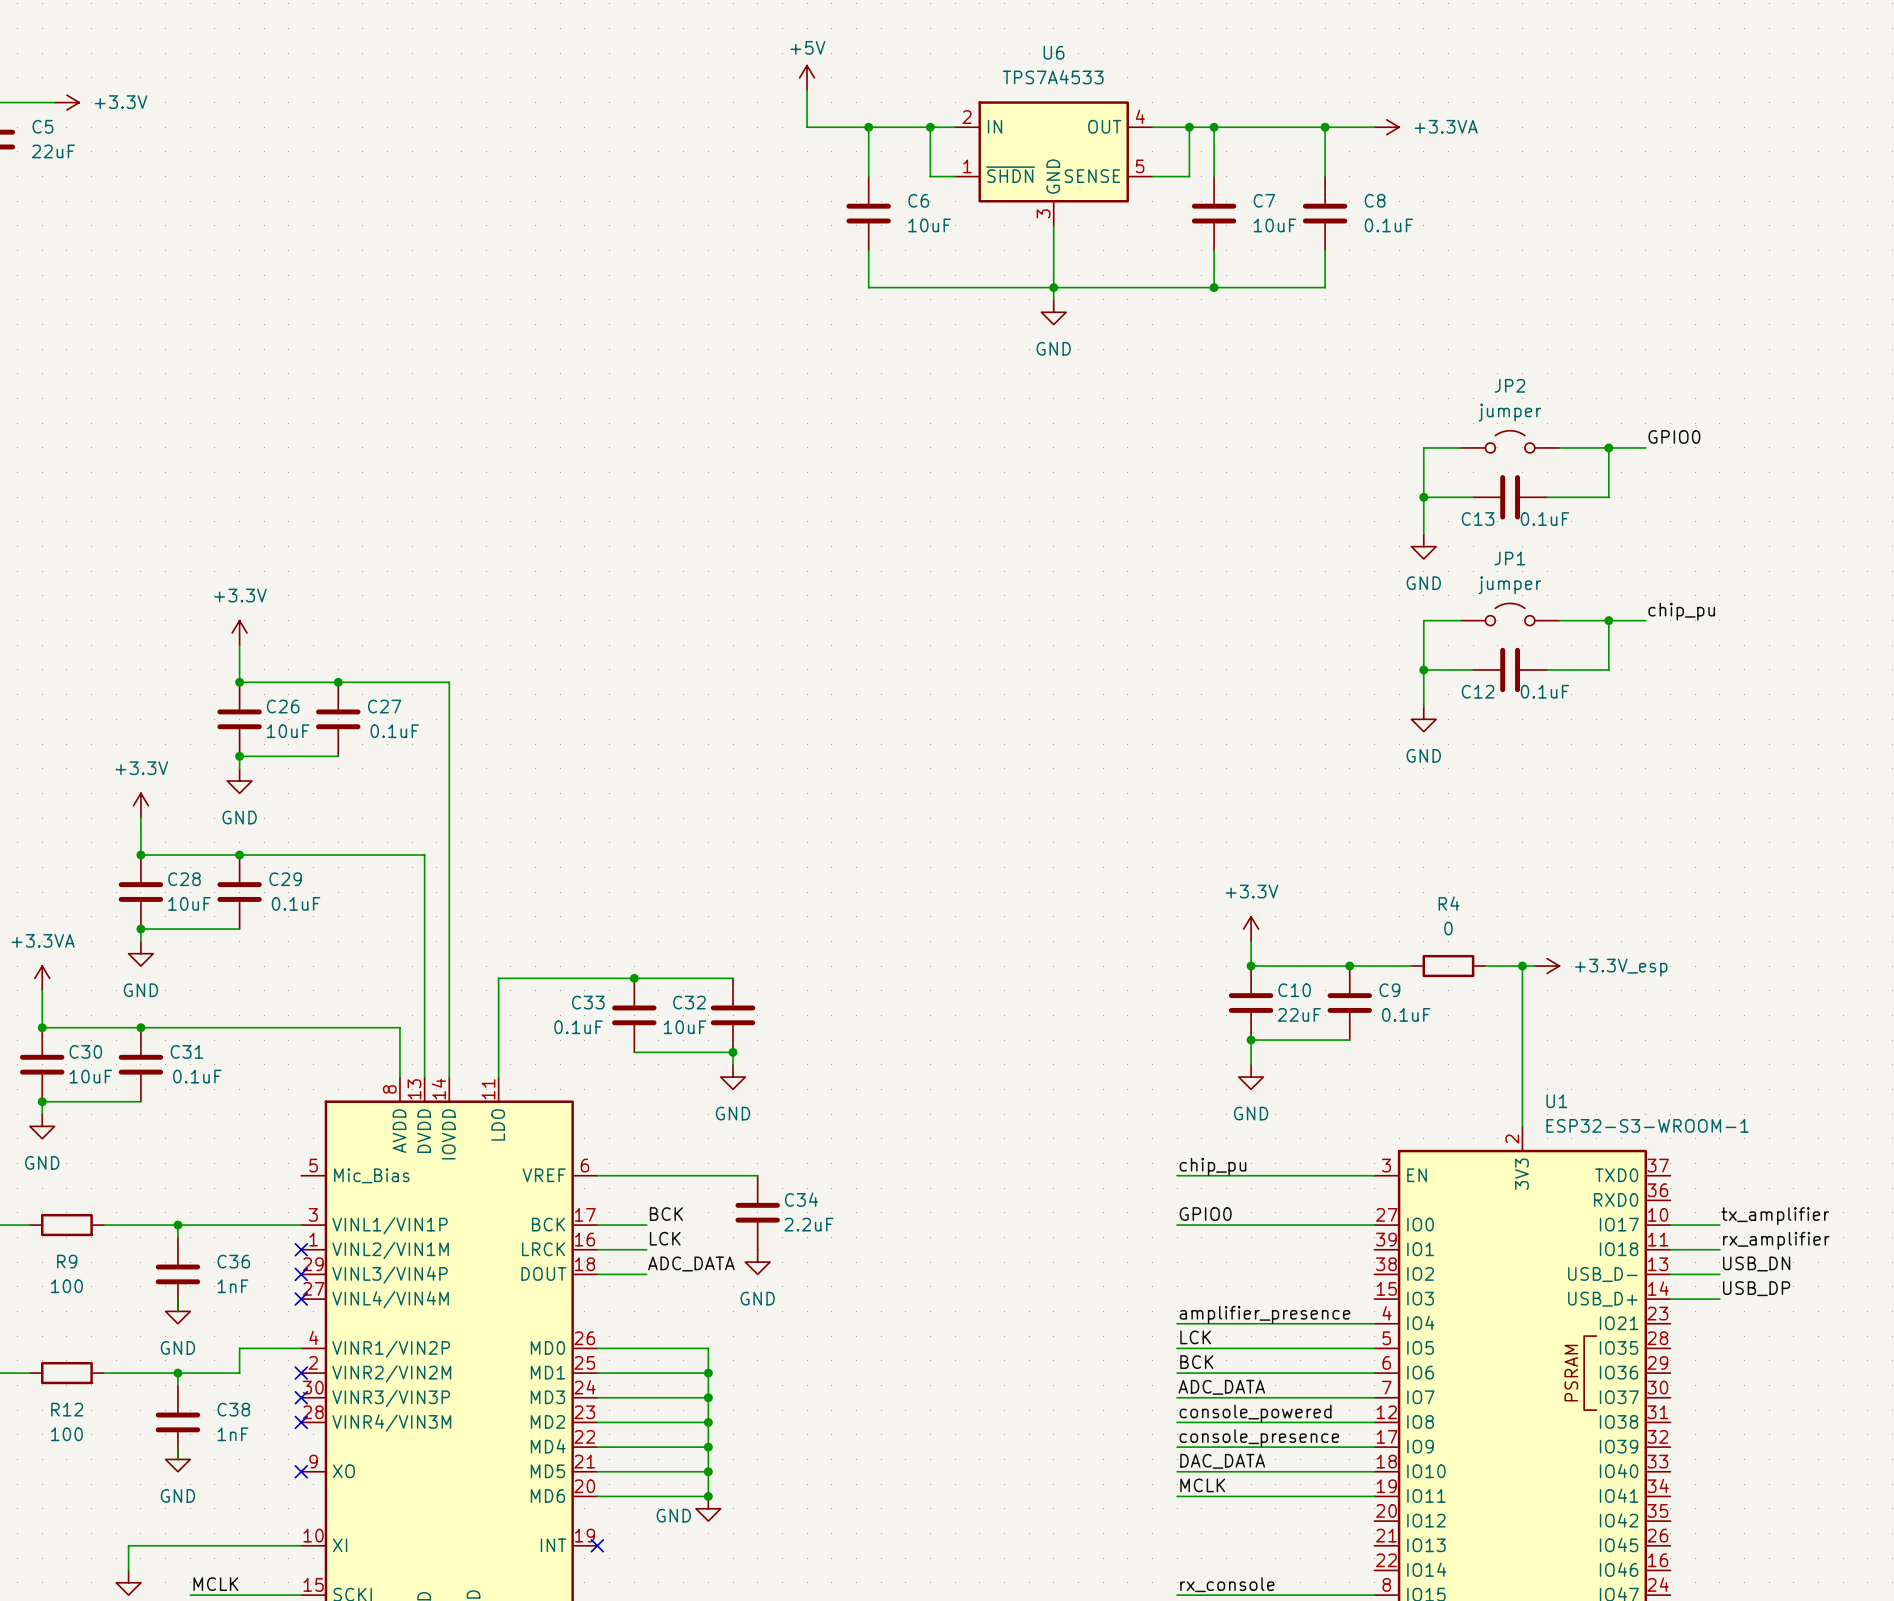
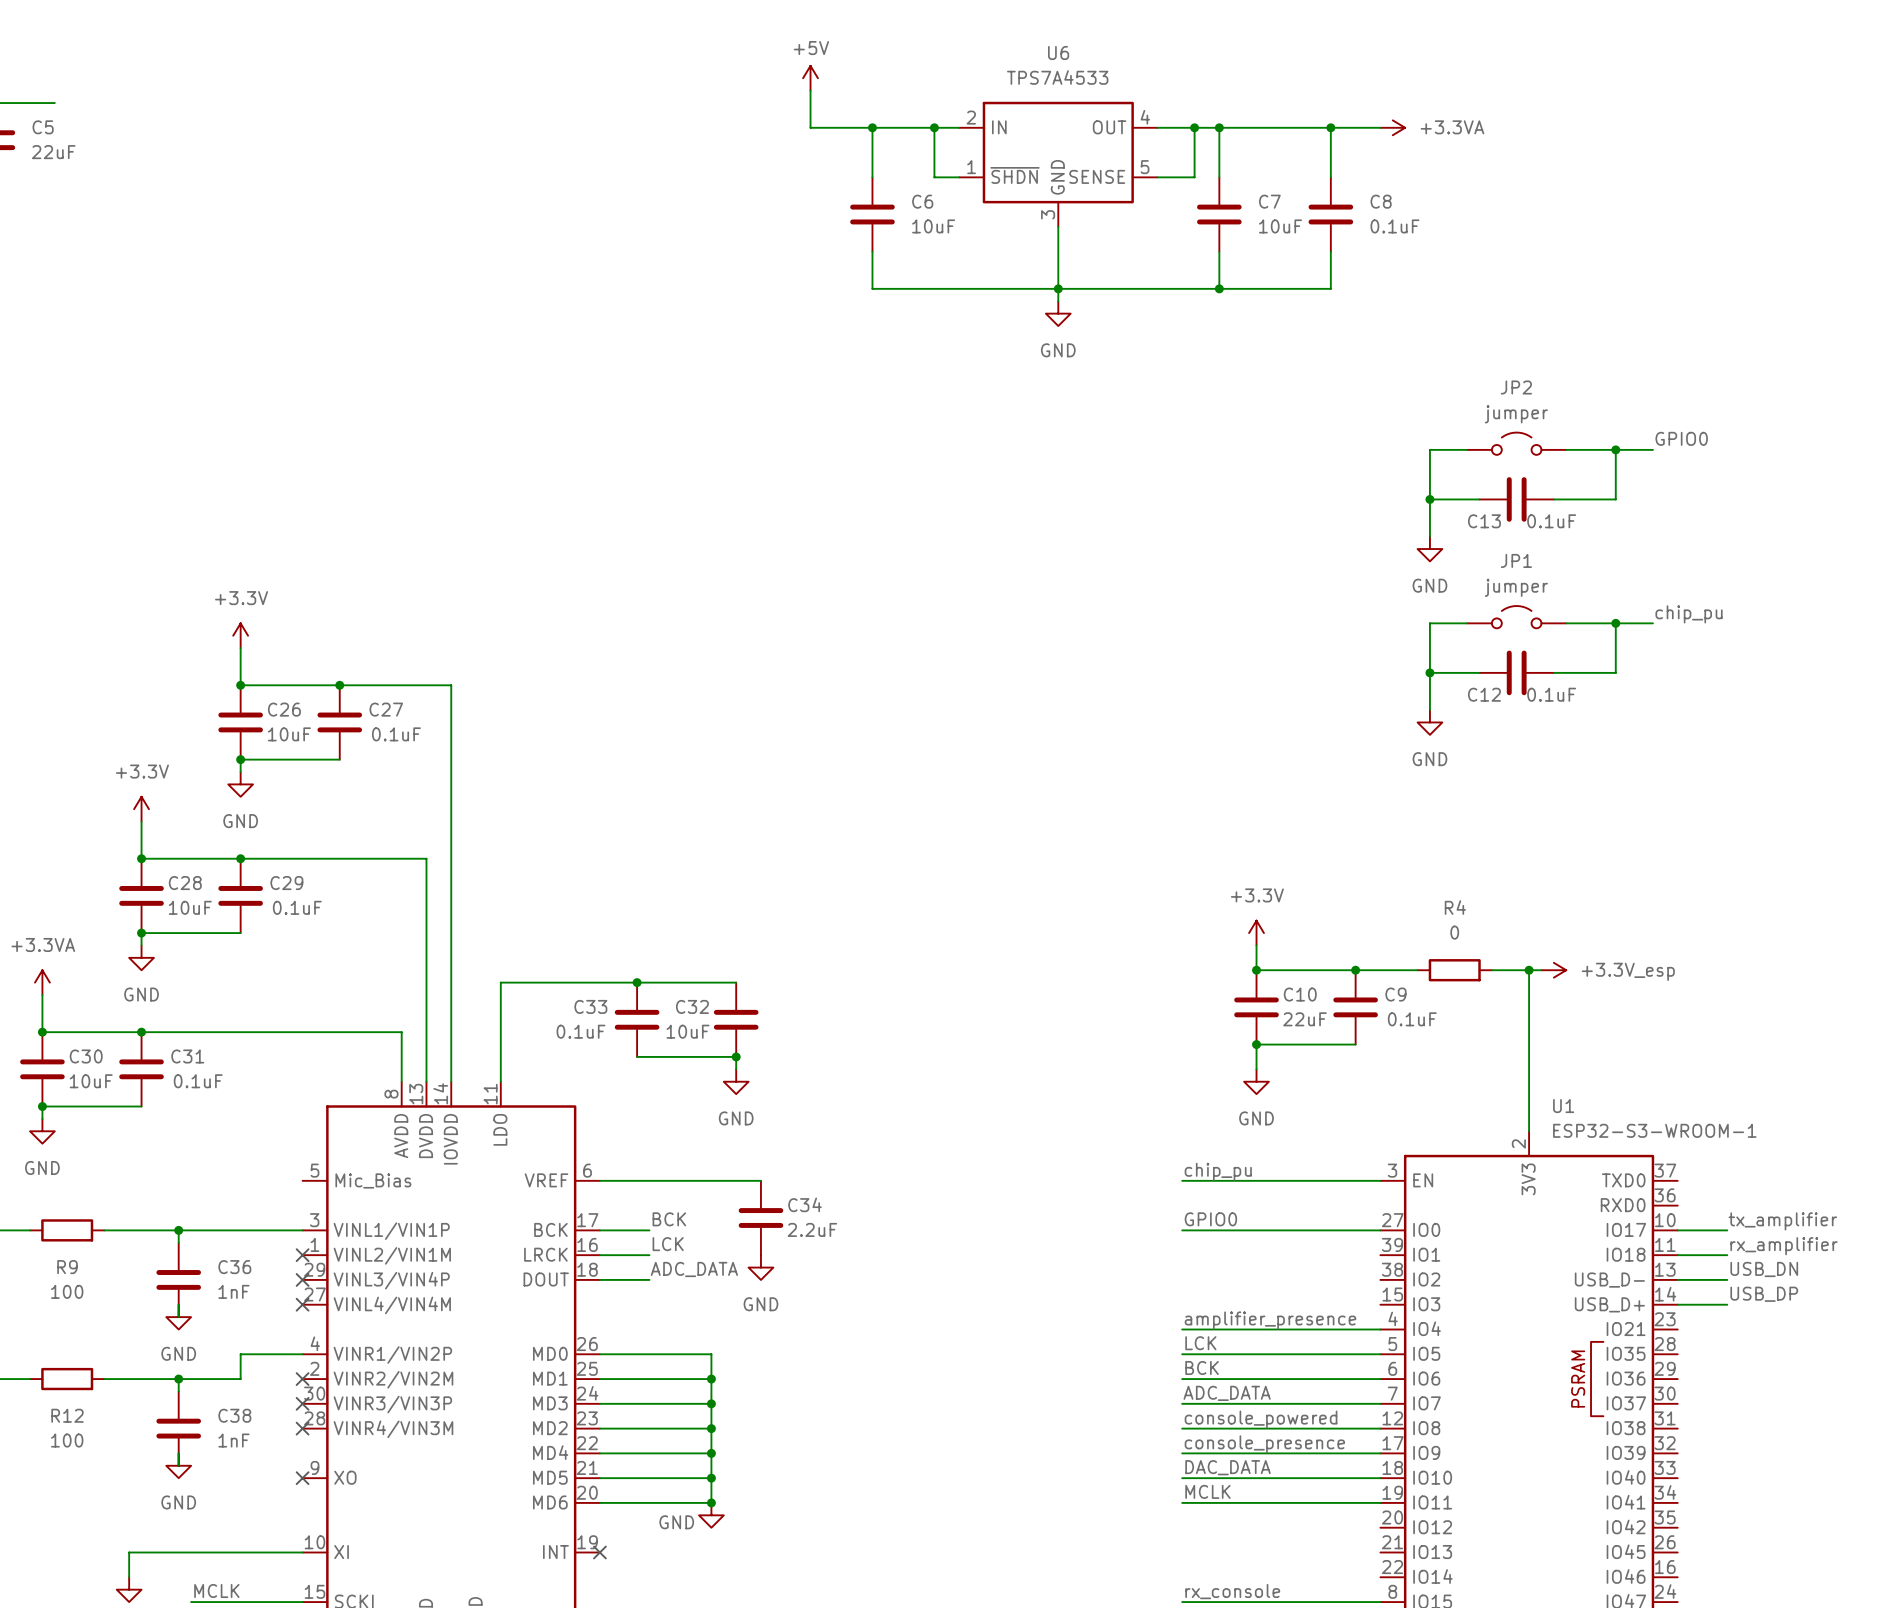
power symbol: +3.3V (66, 102) -> none

